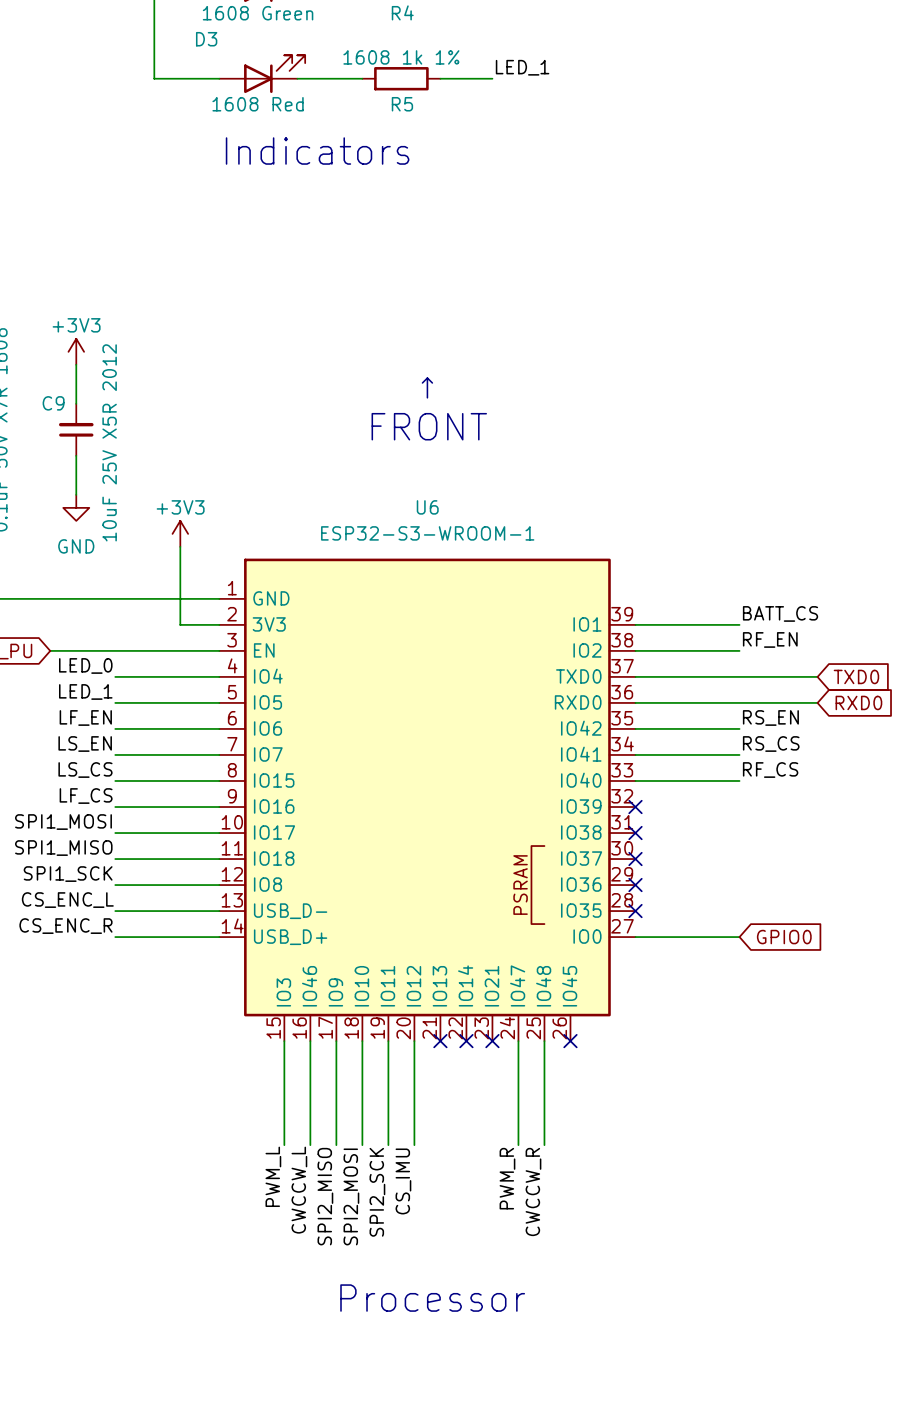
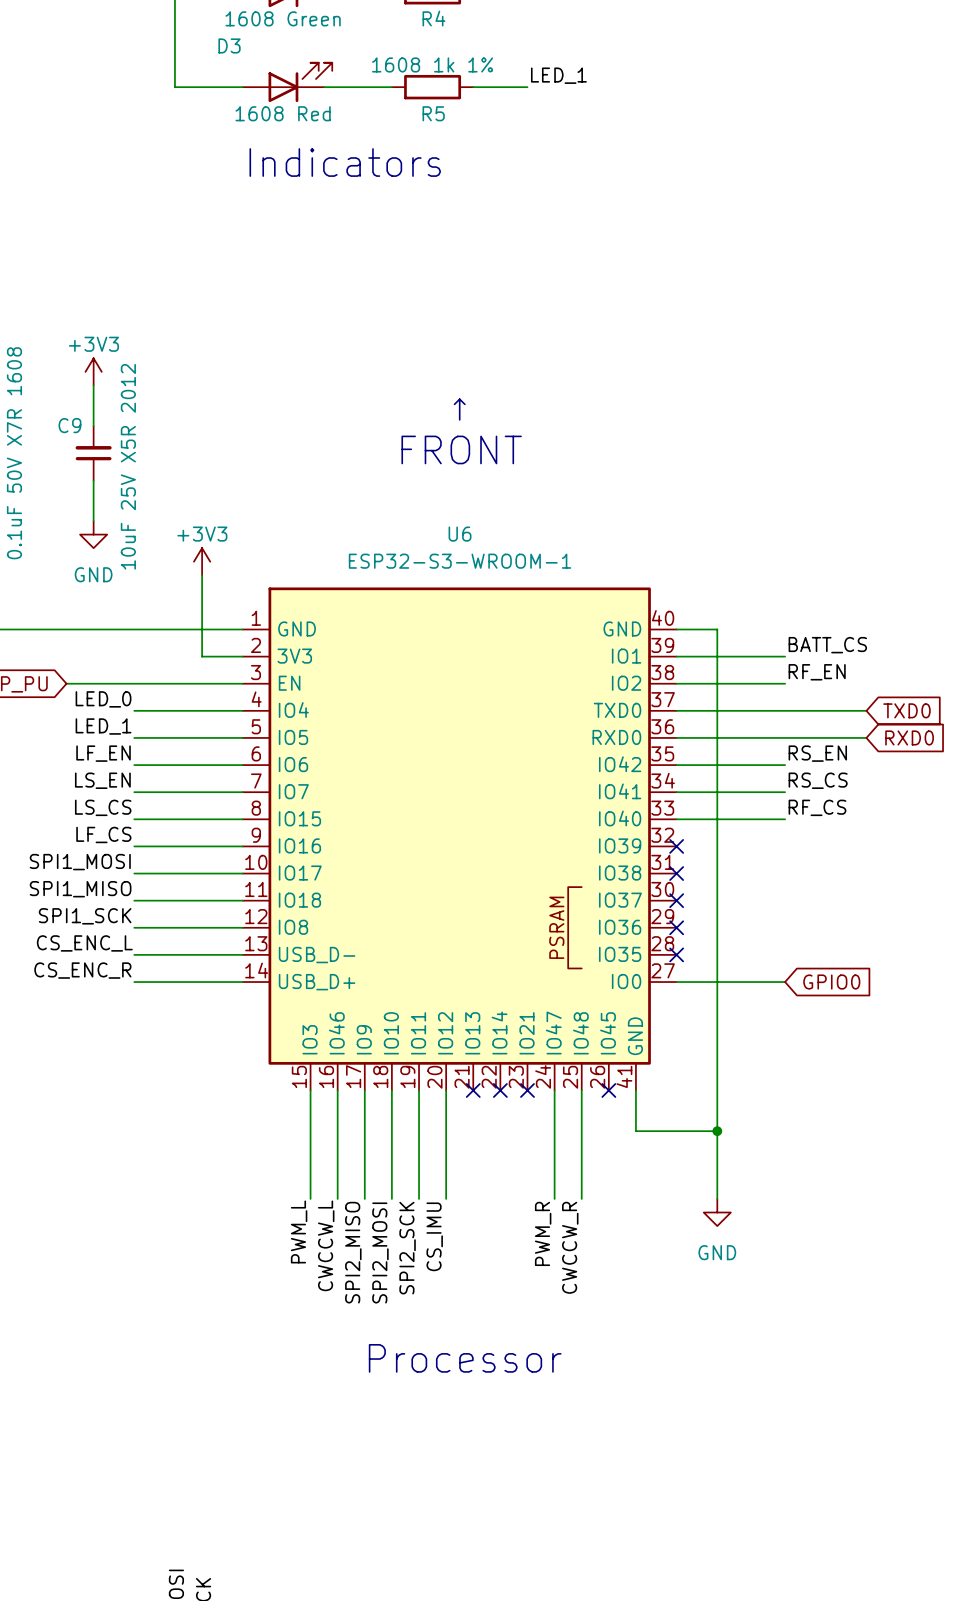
U6 symbol: [219, 558, 636, 1042] -> [242, 587, 677, 1091]
wire: none -> (676, 629) (717, 629) (717, 1198)
wire: none -> (635, 1090) (635, 1131) (717, 1131)
junction: none -> (717, 1131)
power symbol: none -> GND (717, 1212)

